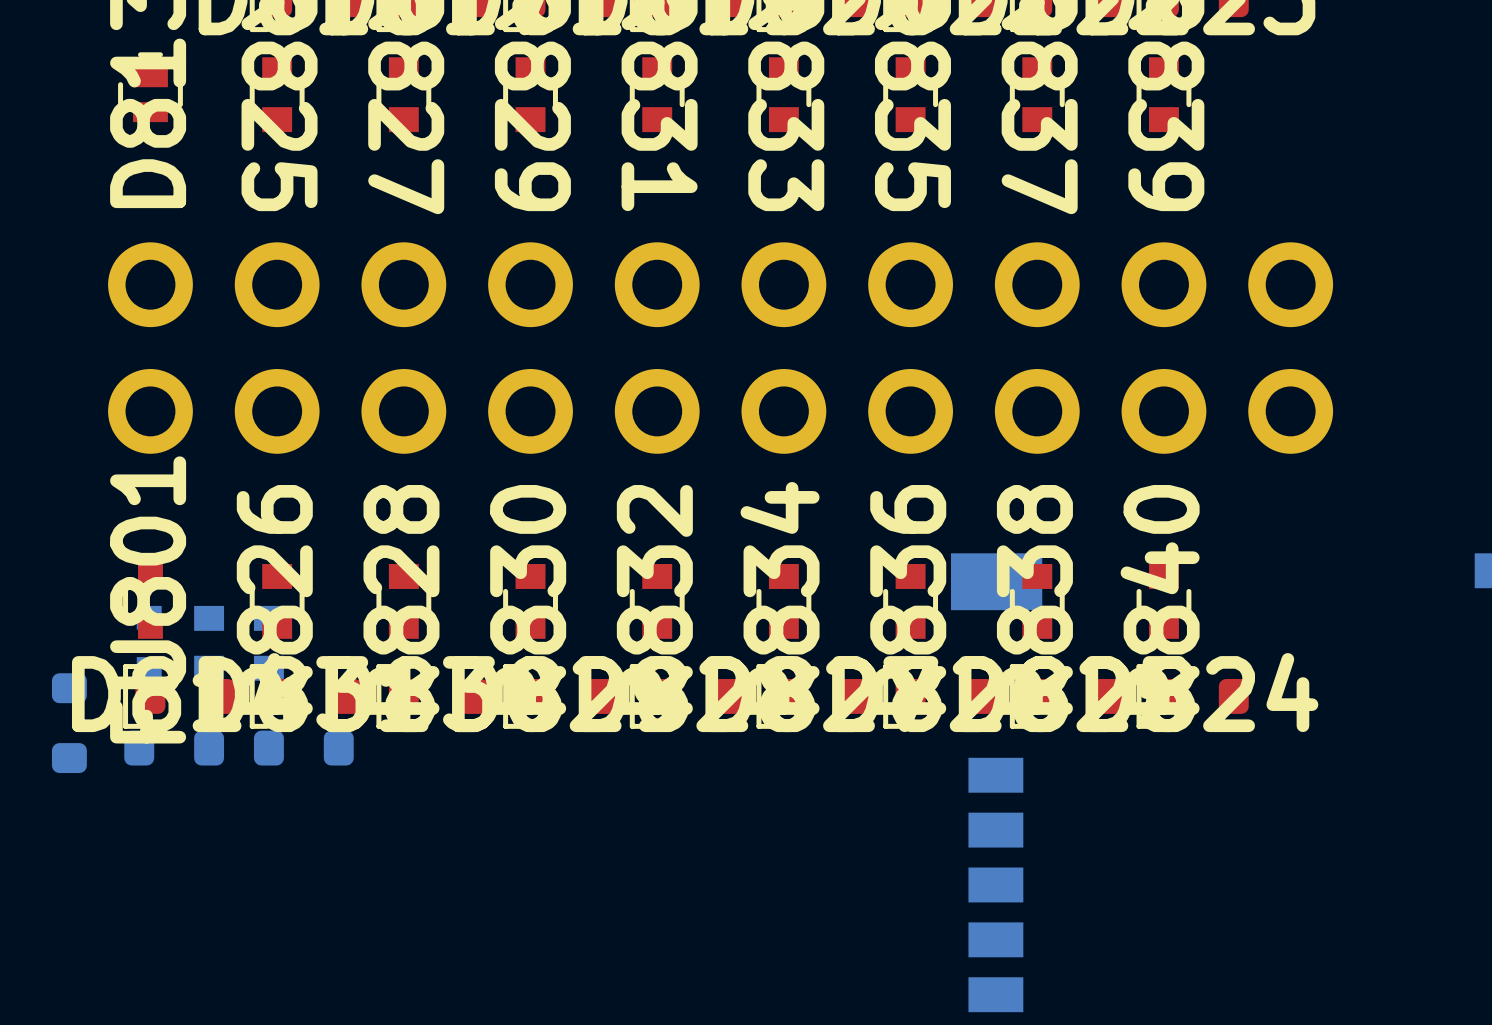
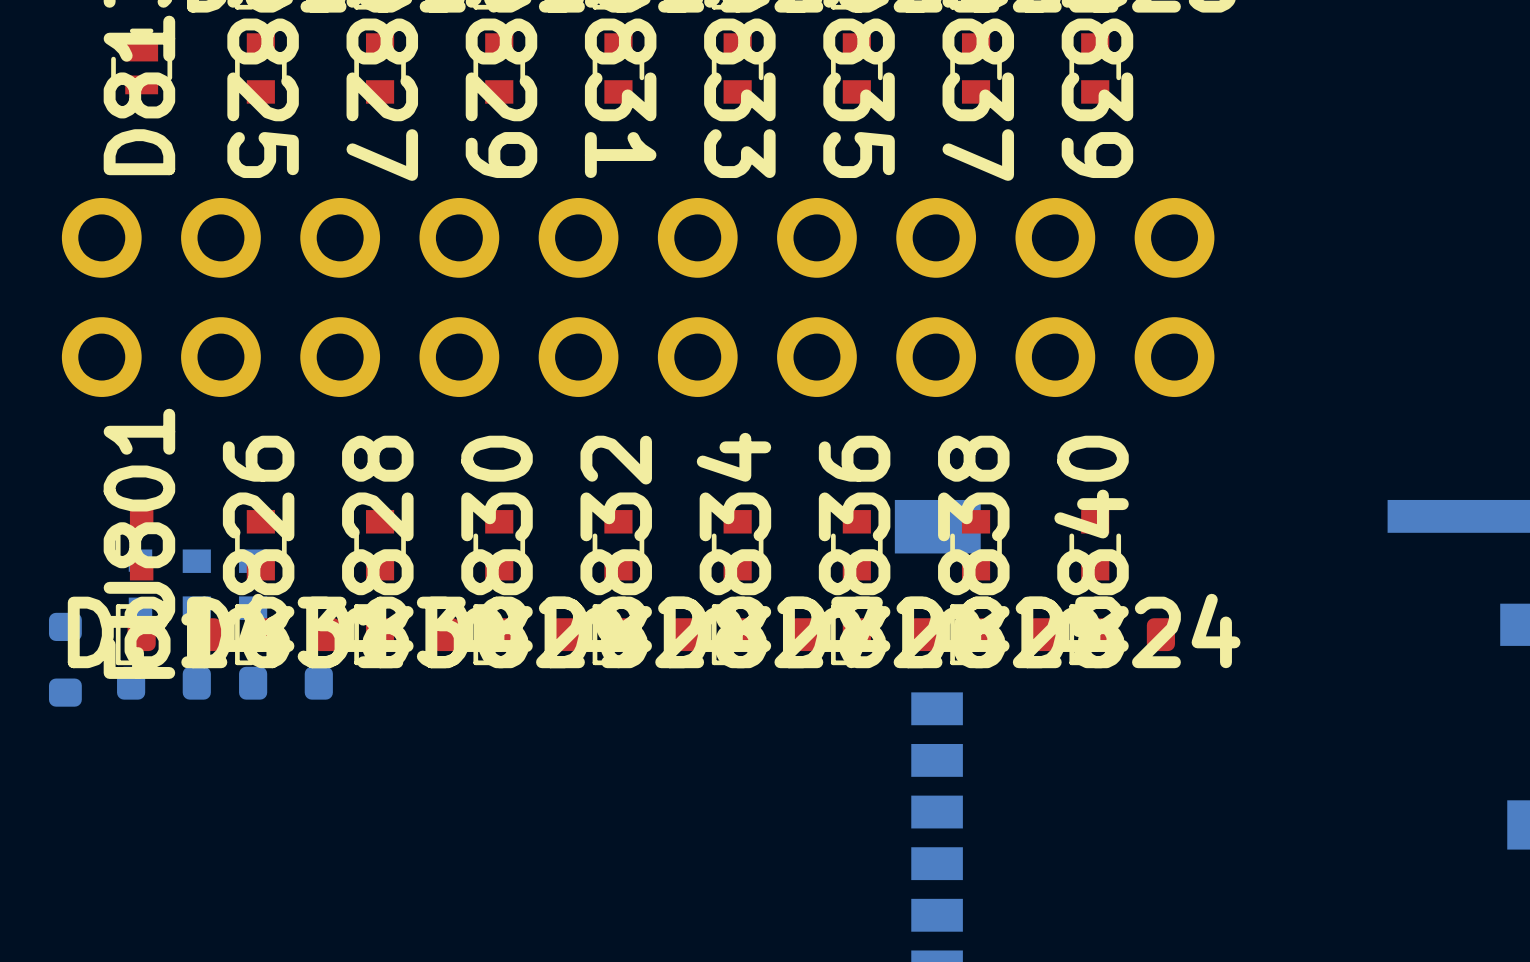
part position: (720, 348) -> (638, 297)

